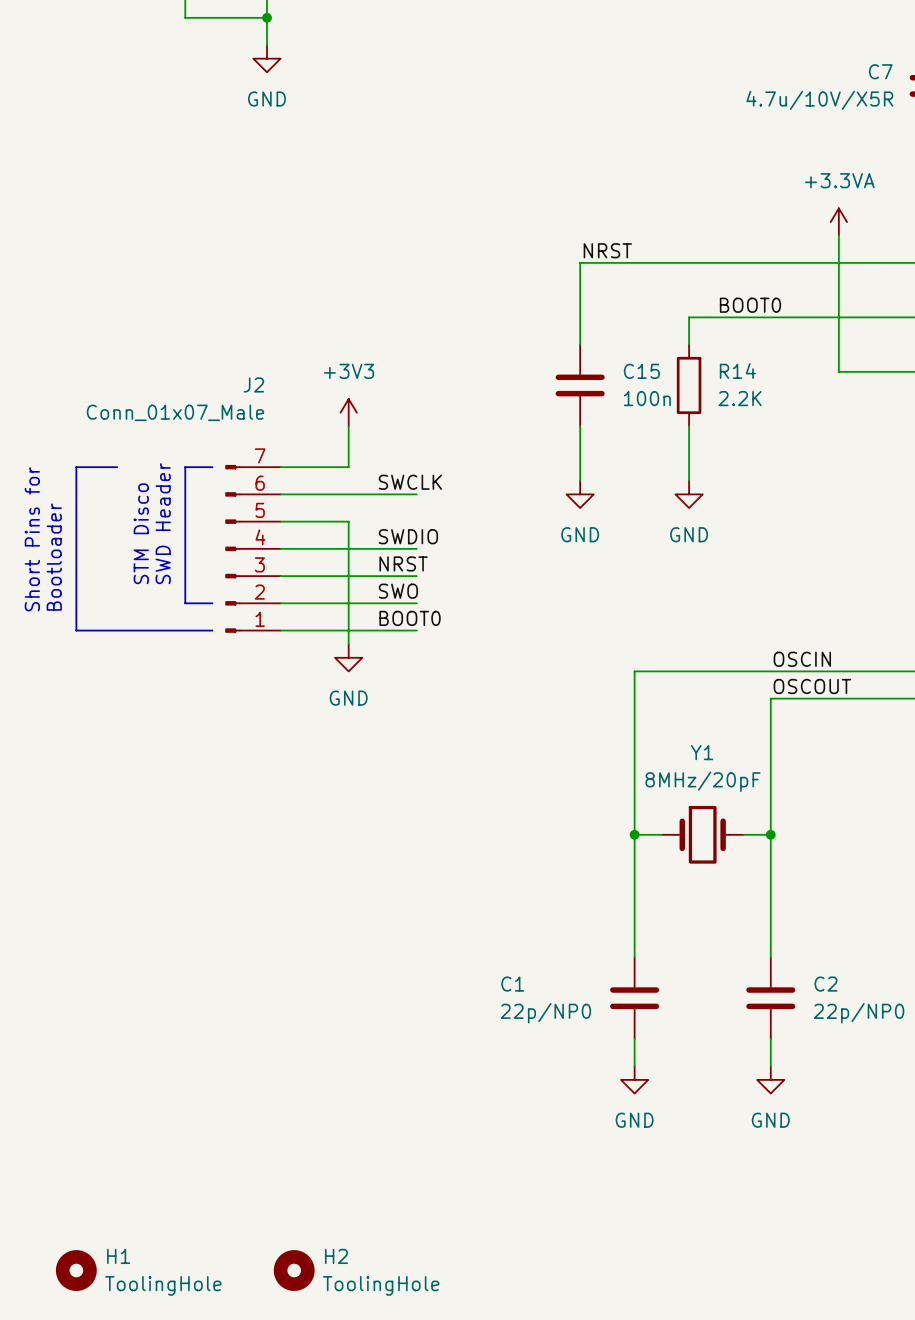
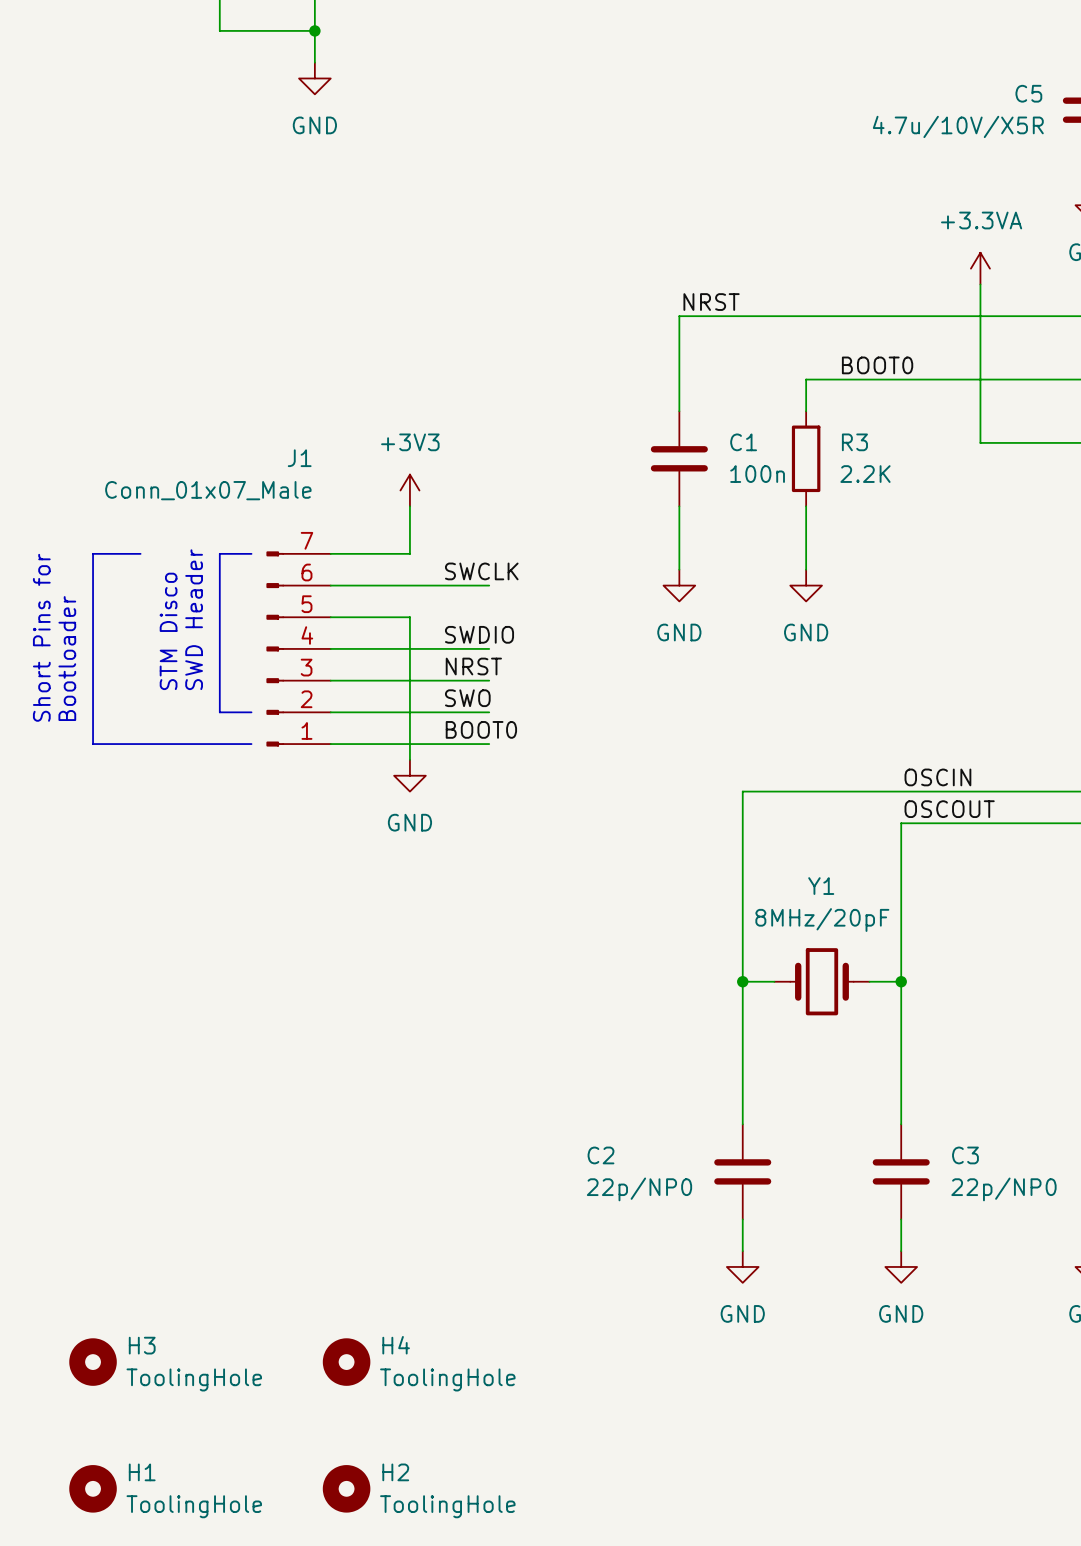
C7 name: C7 (880, 71) -> C5 (1028, 93)
C15 name: C15 (641, 371) -> C1 (743, 442)
R14 name: R14 (737, 371) -> R3 (854, 442)
J2 name: J2 (253, 384) -> J1 (299, 458)
C1 name: C1 (512, 984) -> C2 (601, 1155)
C2 name: C2 (825, 984) -> C3 (965, 1155)
H3: none -> ToolingHole (93, 1362)
H4: none -> ToolingHole (346, 1362)

